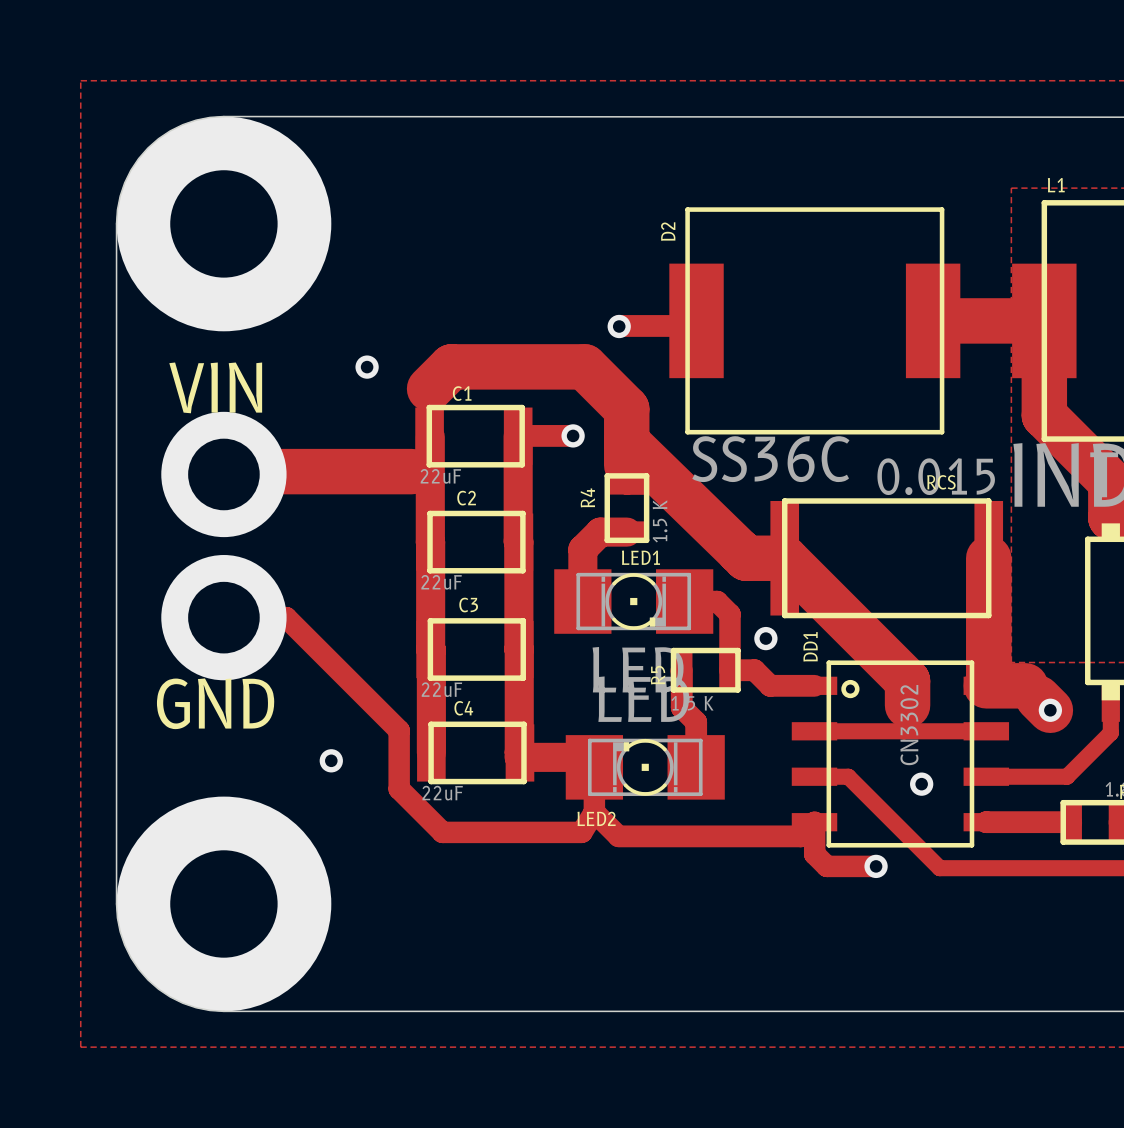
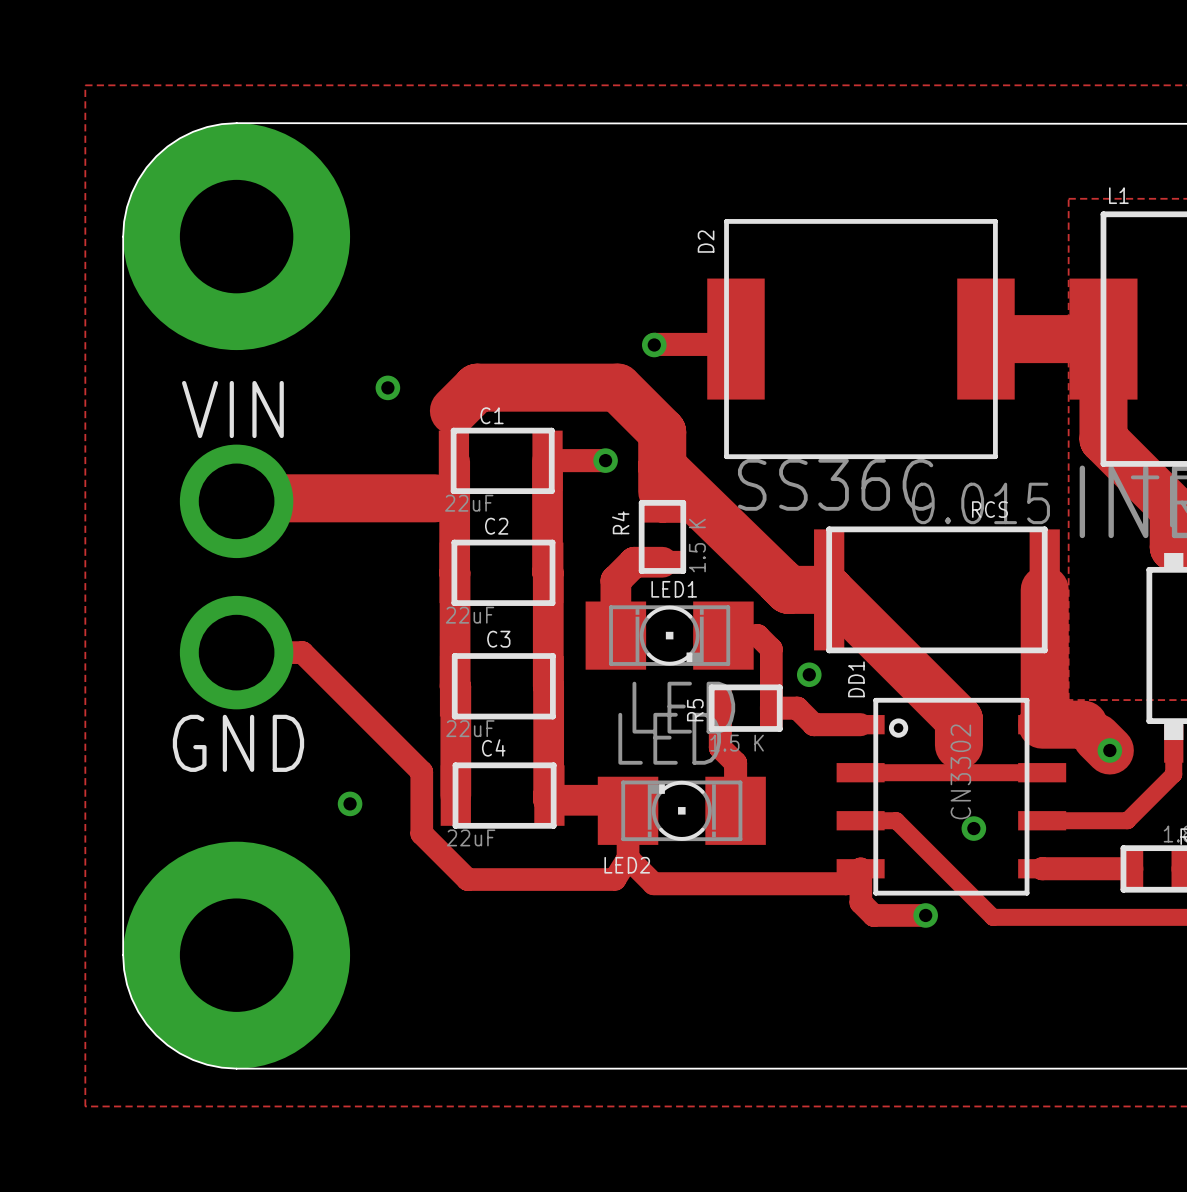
via size: [161, 411, 287, 538] -> [179, 444, 294, 559]
via size: [161, 555, 287, 681] -> [179, 595, 294, 710]

